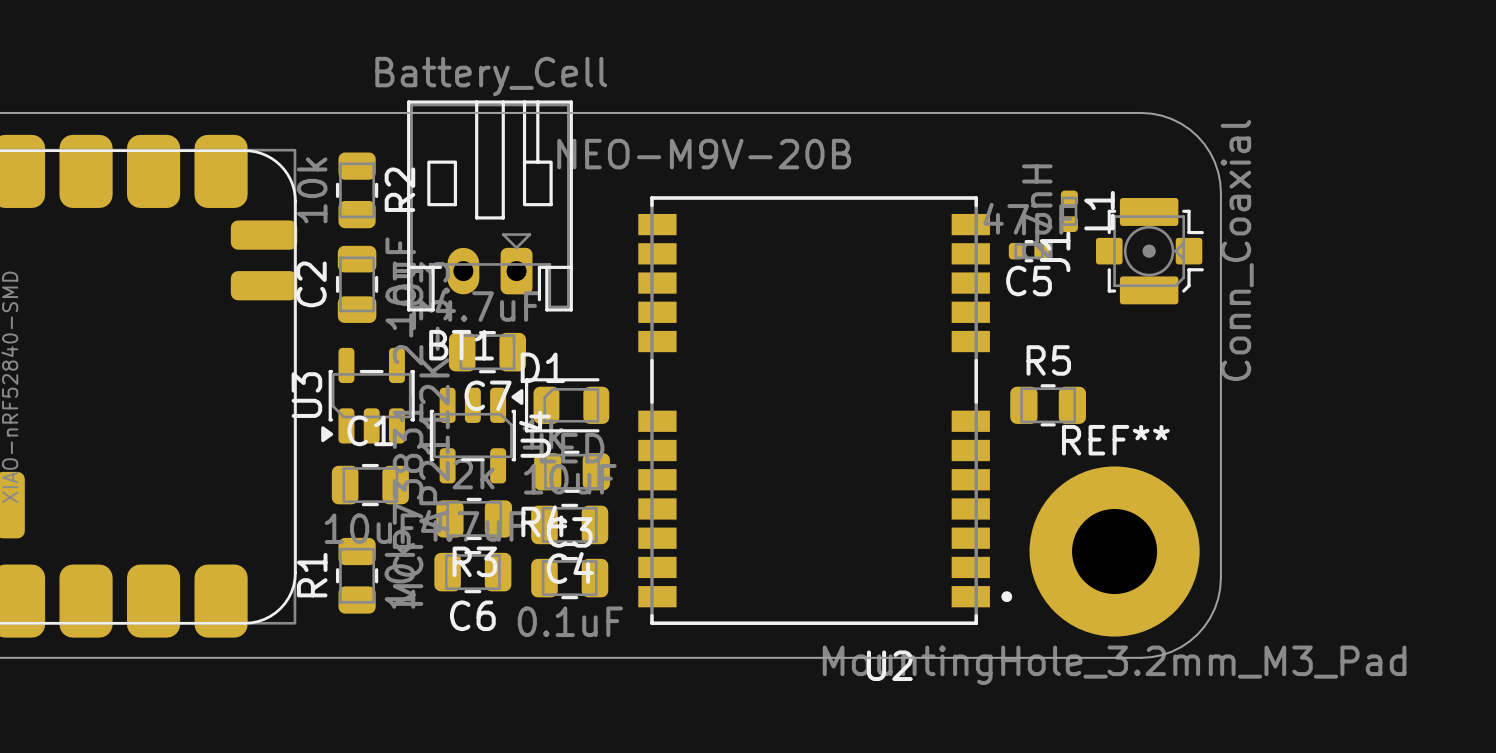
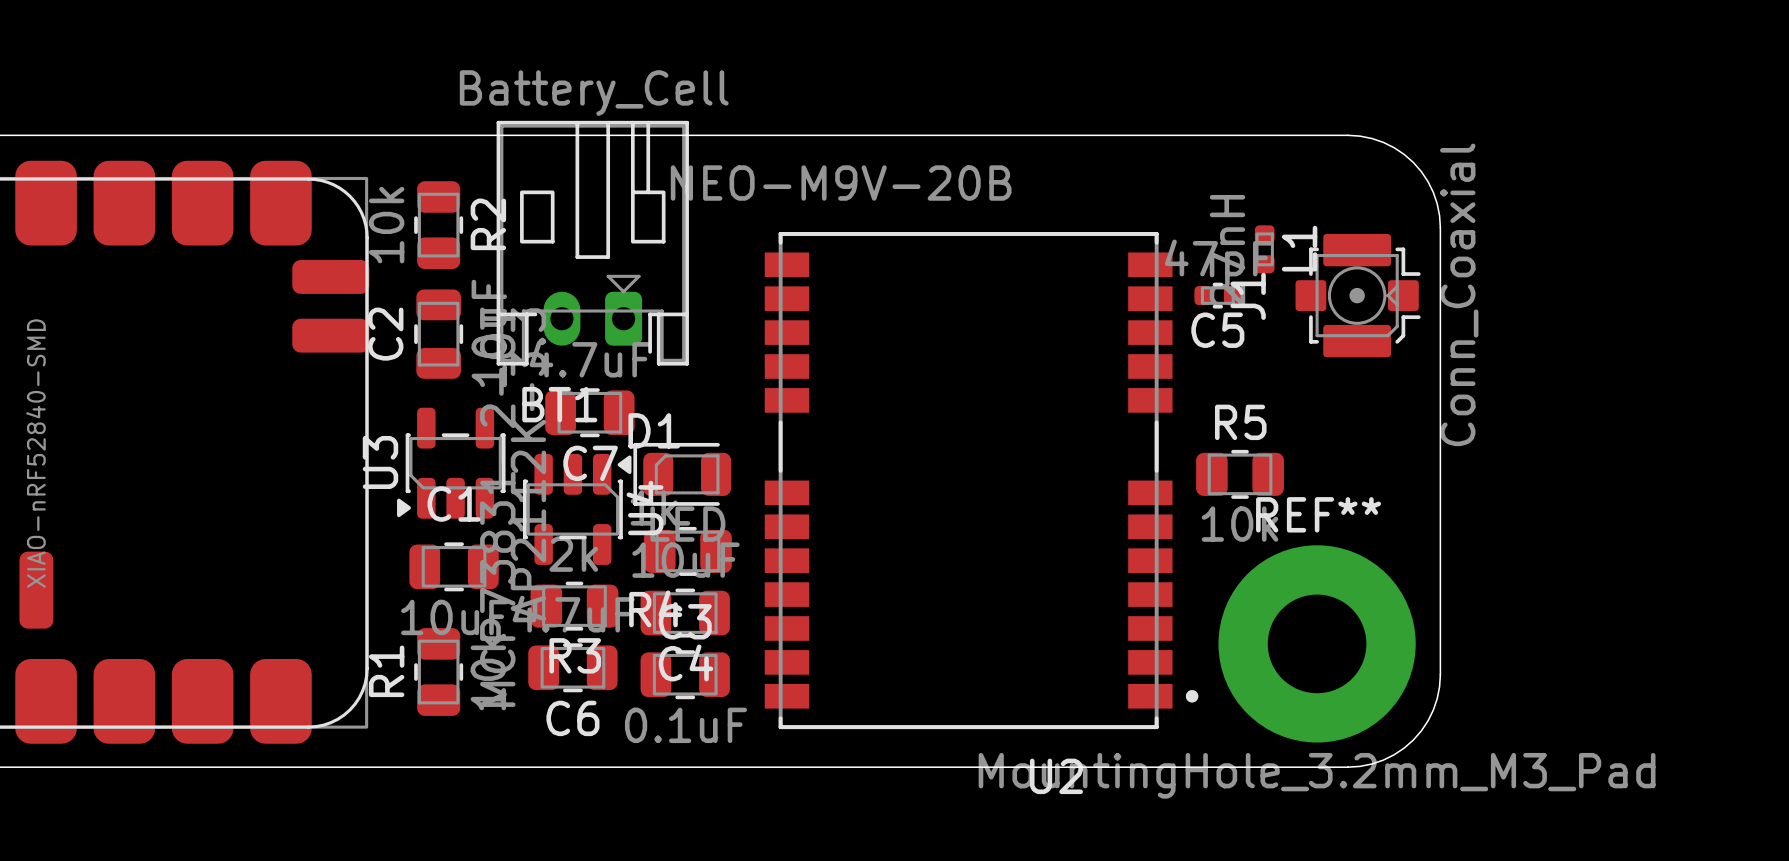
R5 value: none -> 10k (1240, 524)

